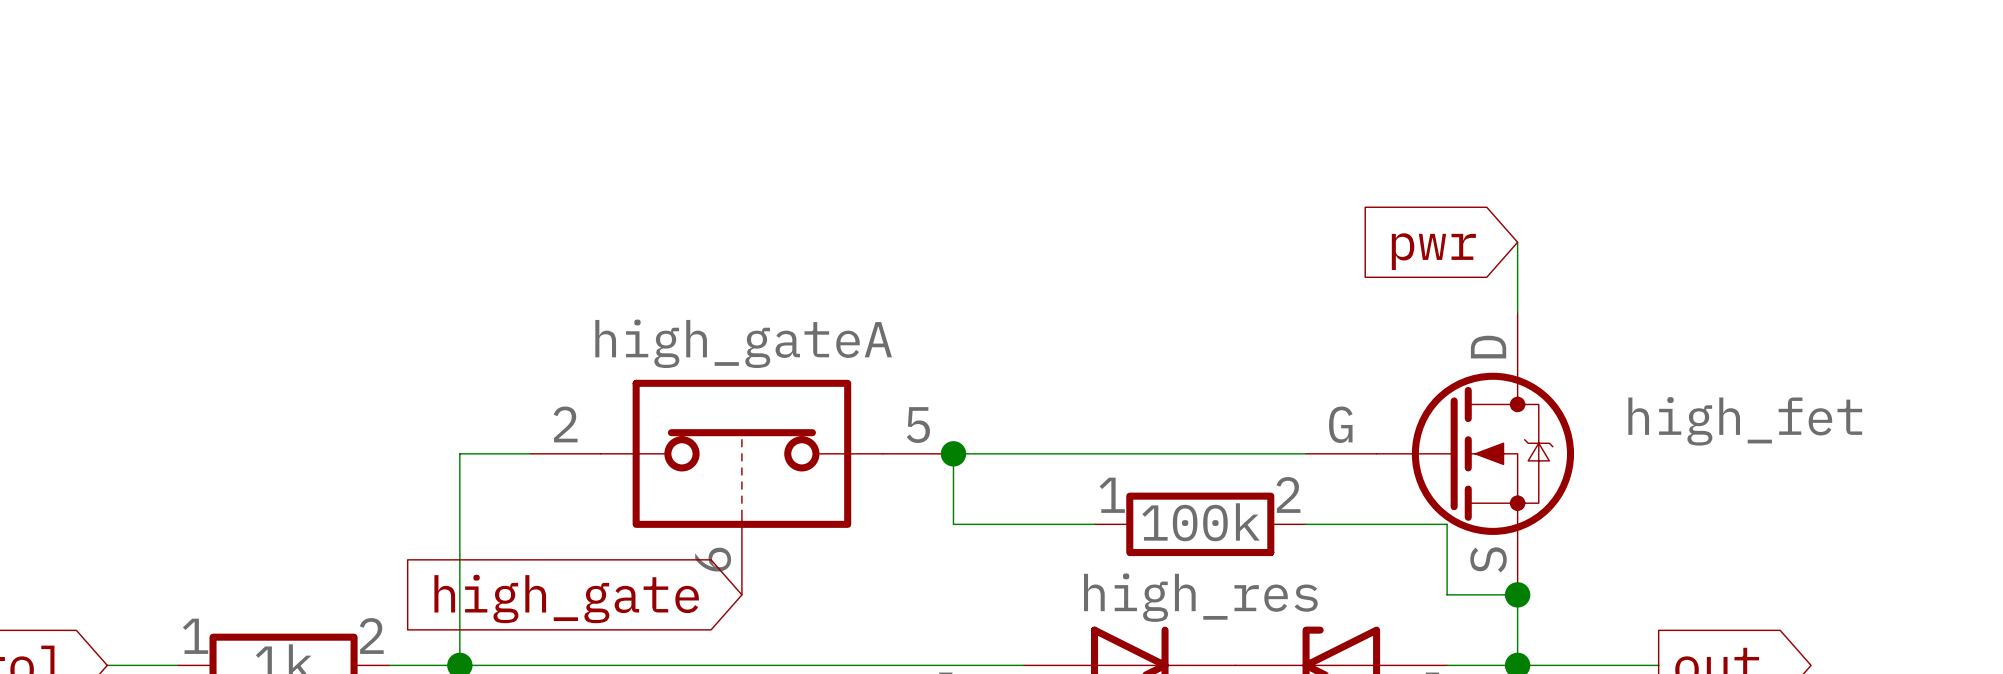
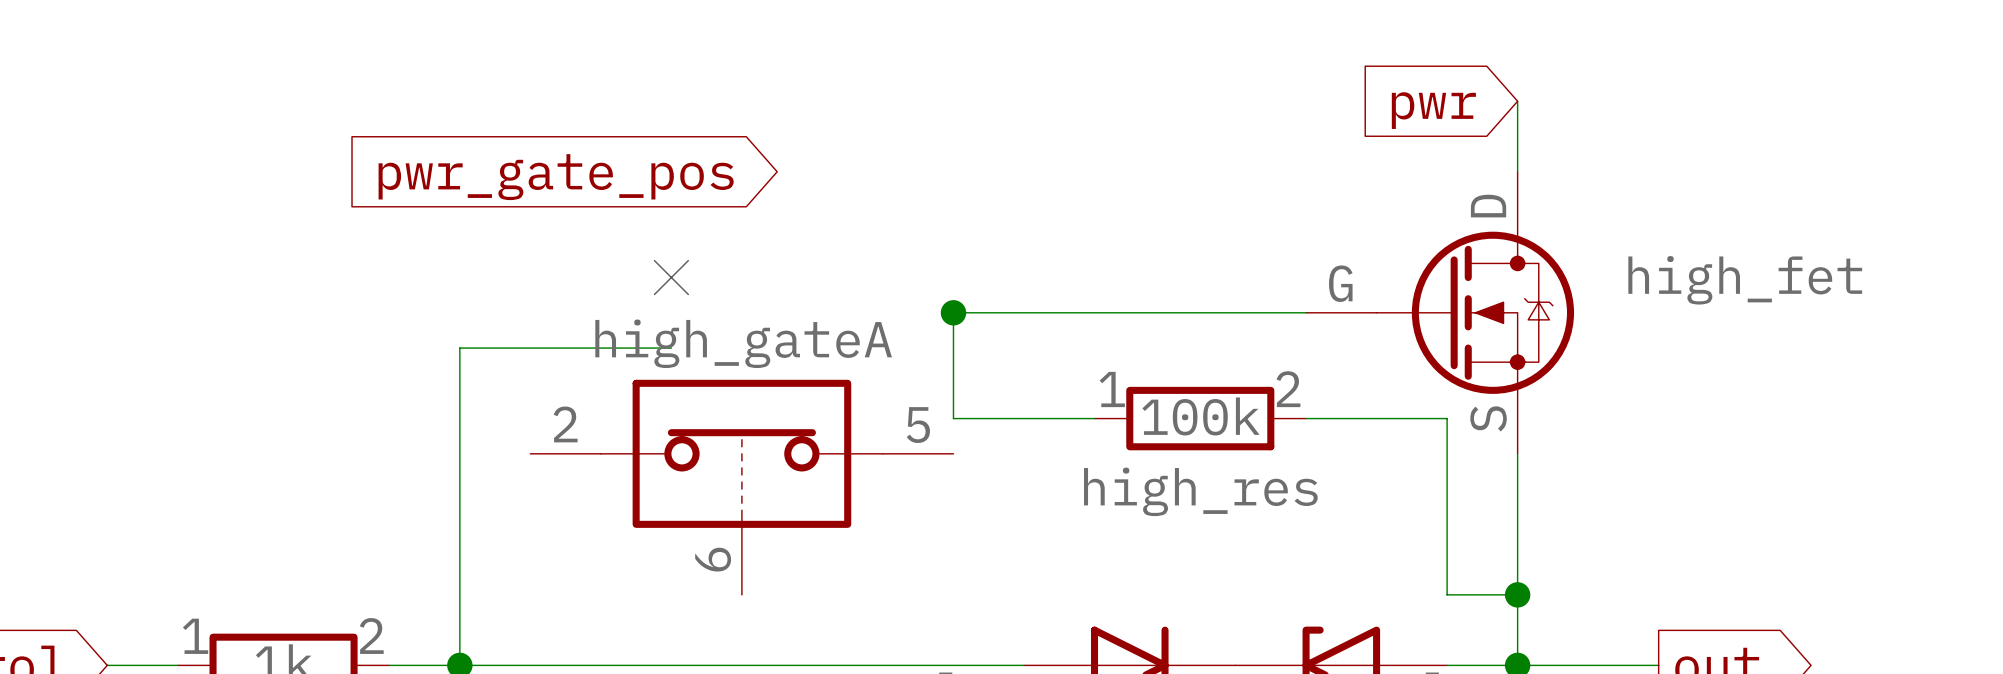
global label: none -> pwr_gate_pos (556, 177)
wire: (1517, 242) (1517, 312) -> (1517, 101) (1517, 171)
global label position: pwr (1433, 251) -> pwr (1433, 110)
no-connect mark: none -> (671, 277)
wire: none -> (1306, 312) (953, 312) (953, 418) (1094, 418)
wire: (459, 453) (530, 453) -> (459, 453) (459, 348) (671, 348)
junction position: (953, 453) -> (953, 312)
wire: (1306, 453) (953, 453) (953, 524) (1094, 524) -> none
high_fet position: (1440, 453) -> (1440, 312)
high_res position: (1200, 524) -> (1200, 418)
wire: (1306, 524) (1447, 524) -> (1306, 418) (1447, 418) (1447, 524)
global label: high_gate (566, 598) -> none

